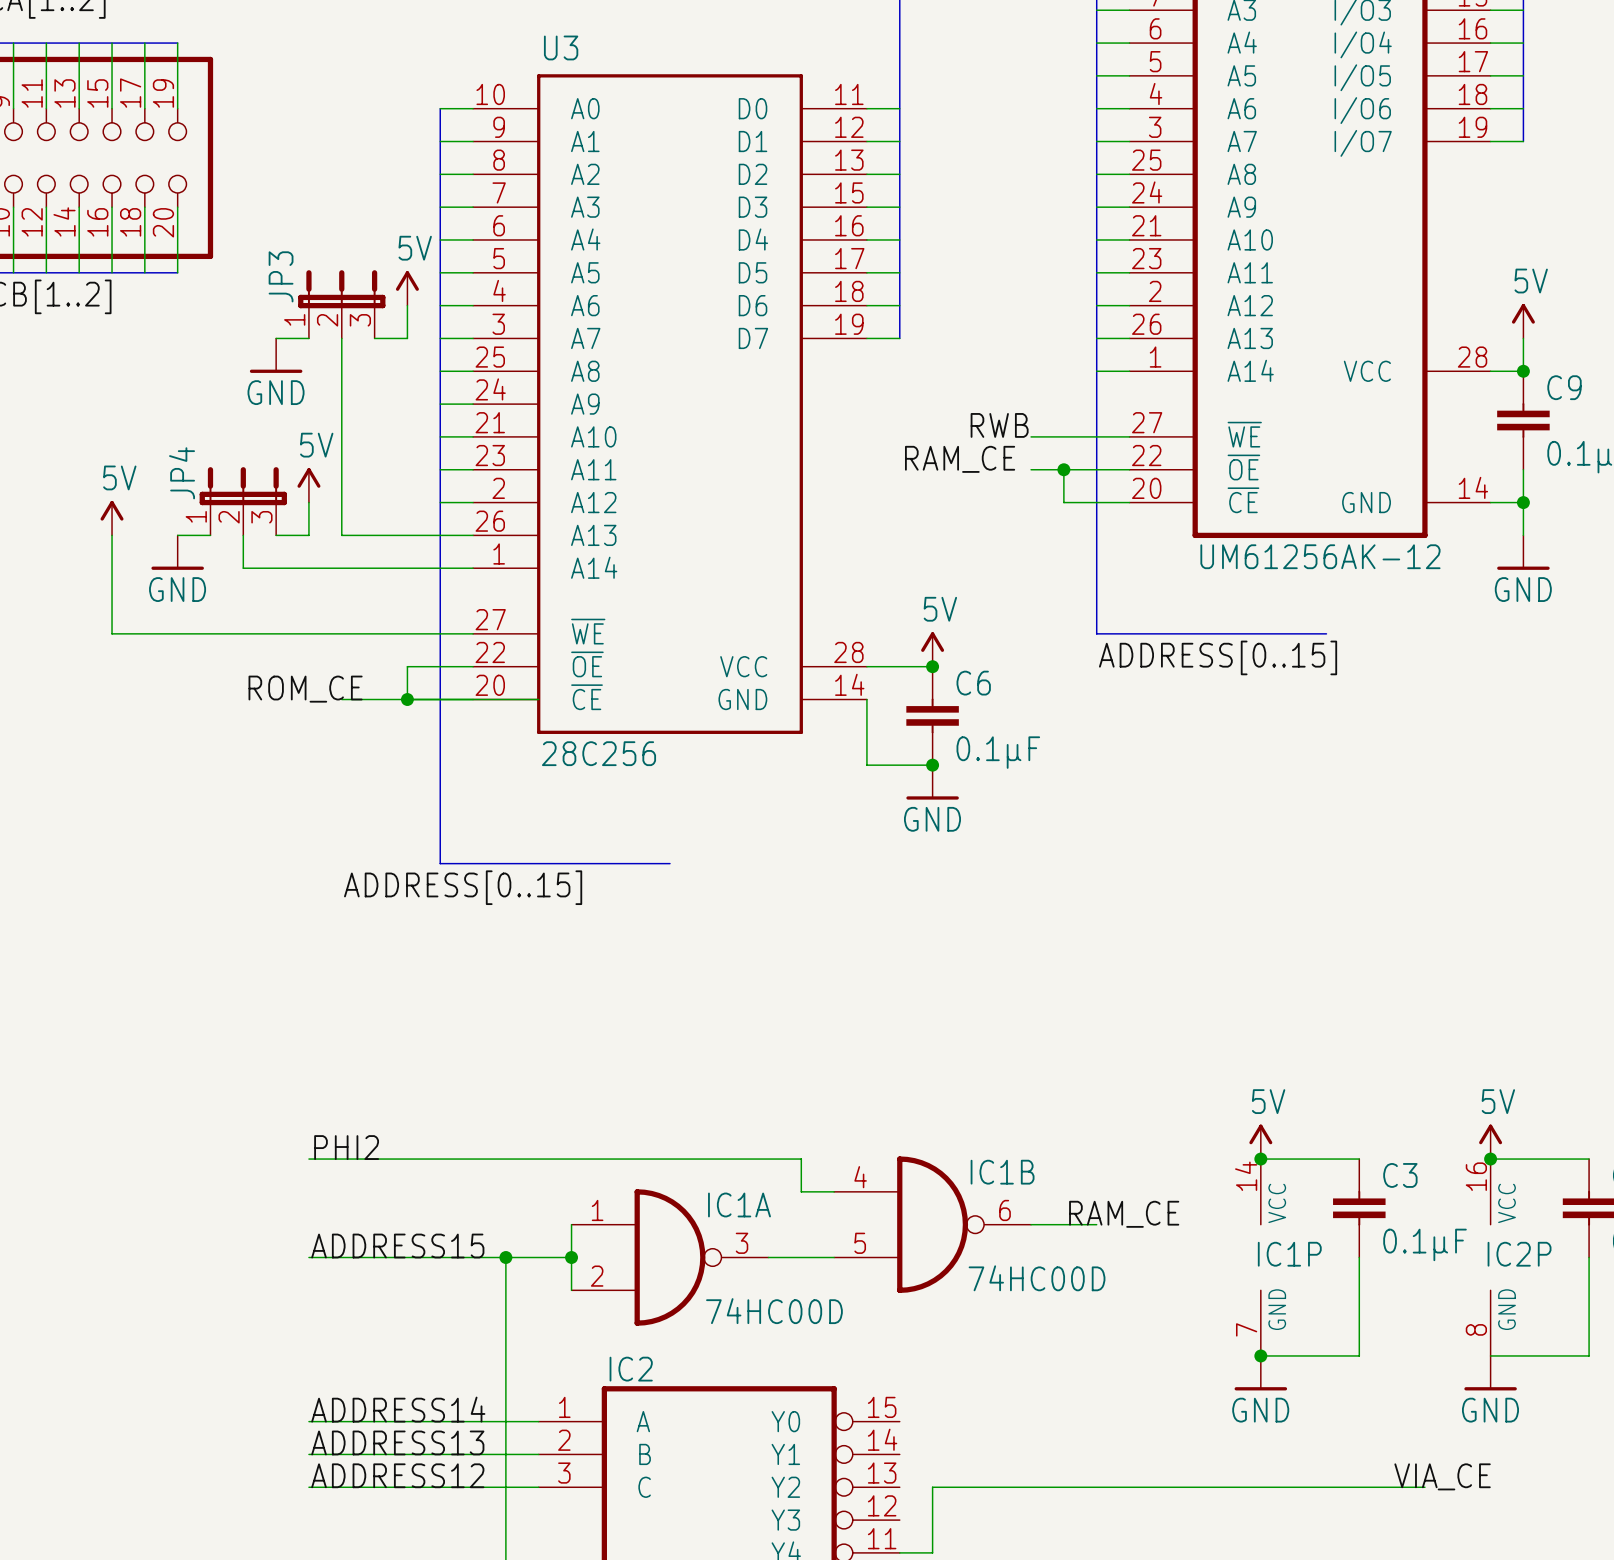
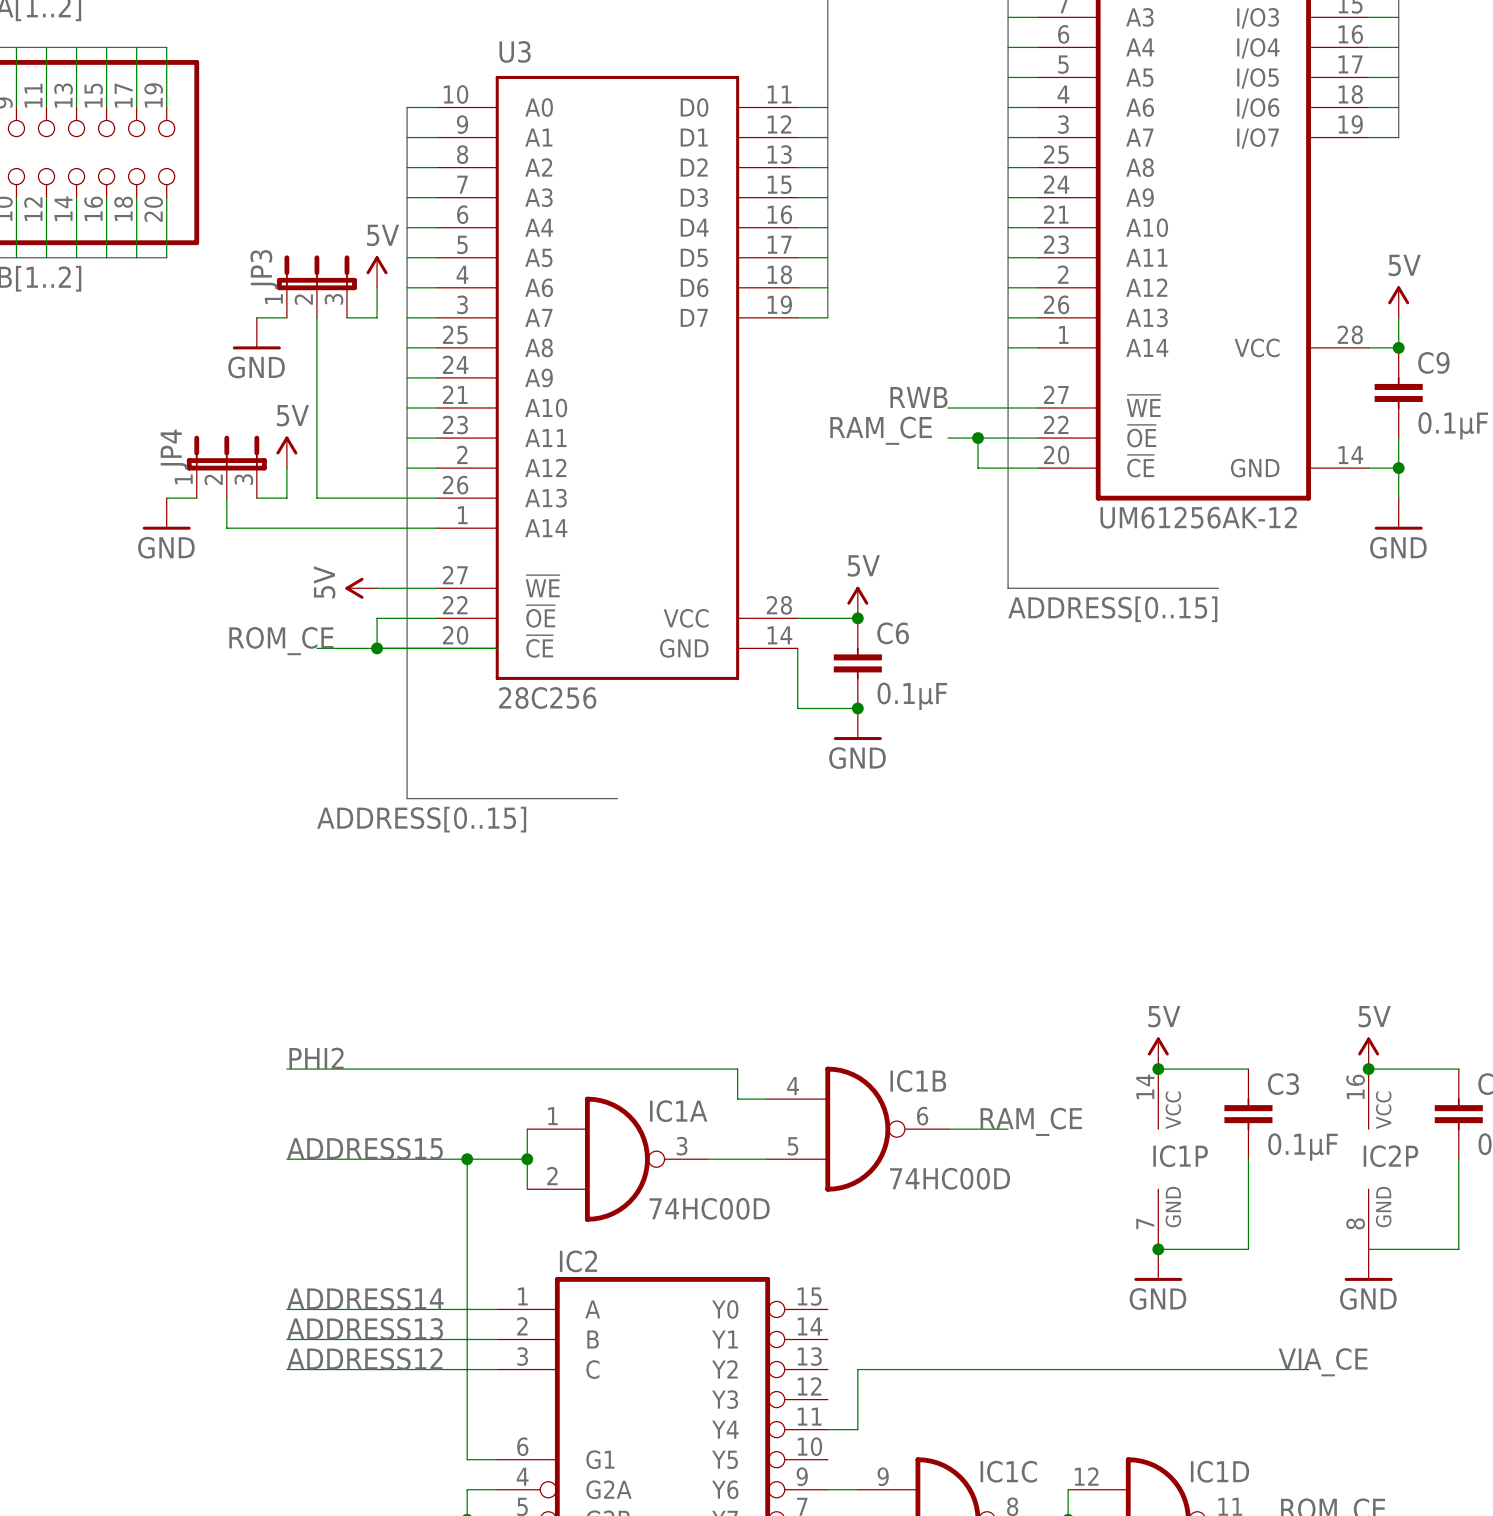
power symbol rotation: 0° (112, 510) -> 90° counterclockwise (354, 588)
power symbol position: 5V (112, 518) -> 5V (361, 588)
wire: (112, 535) (112, 633) (407, 633) -> none

